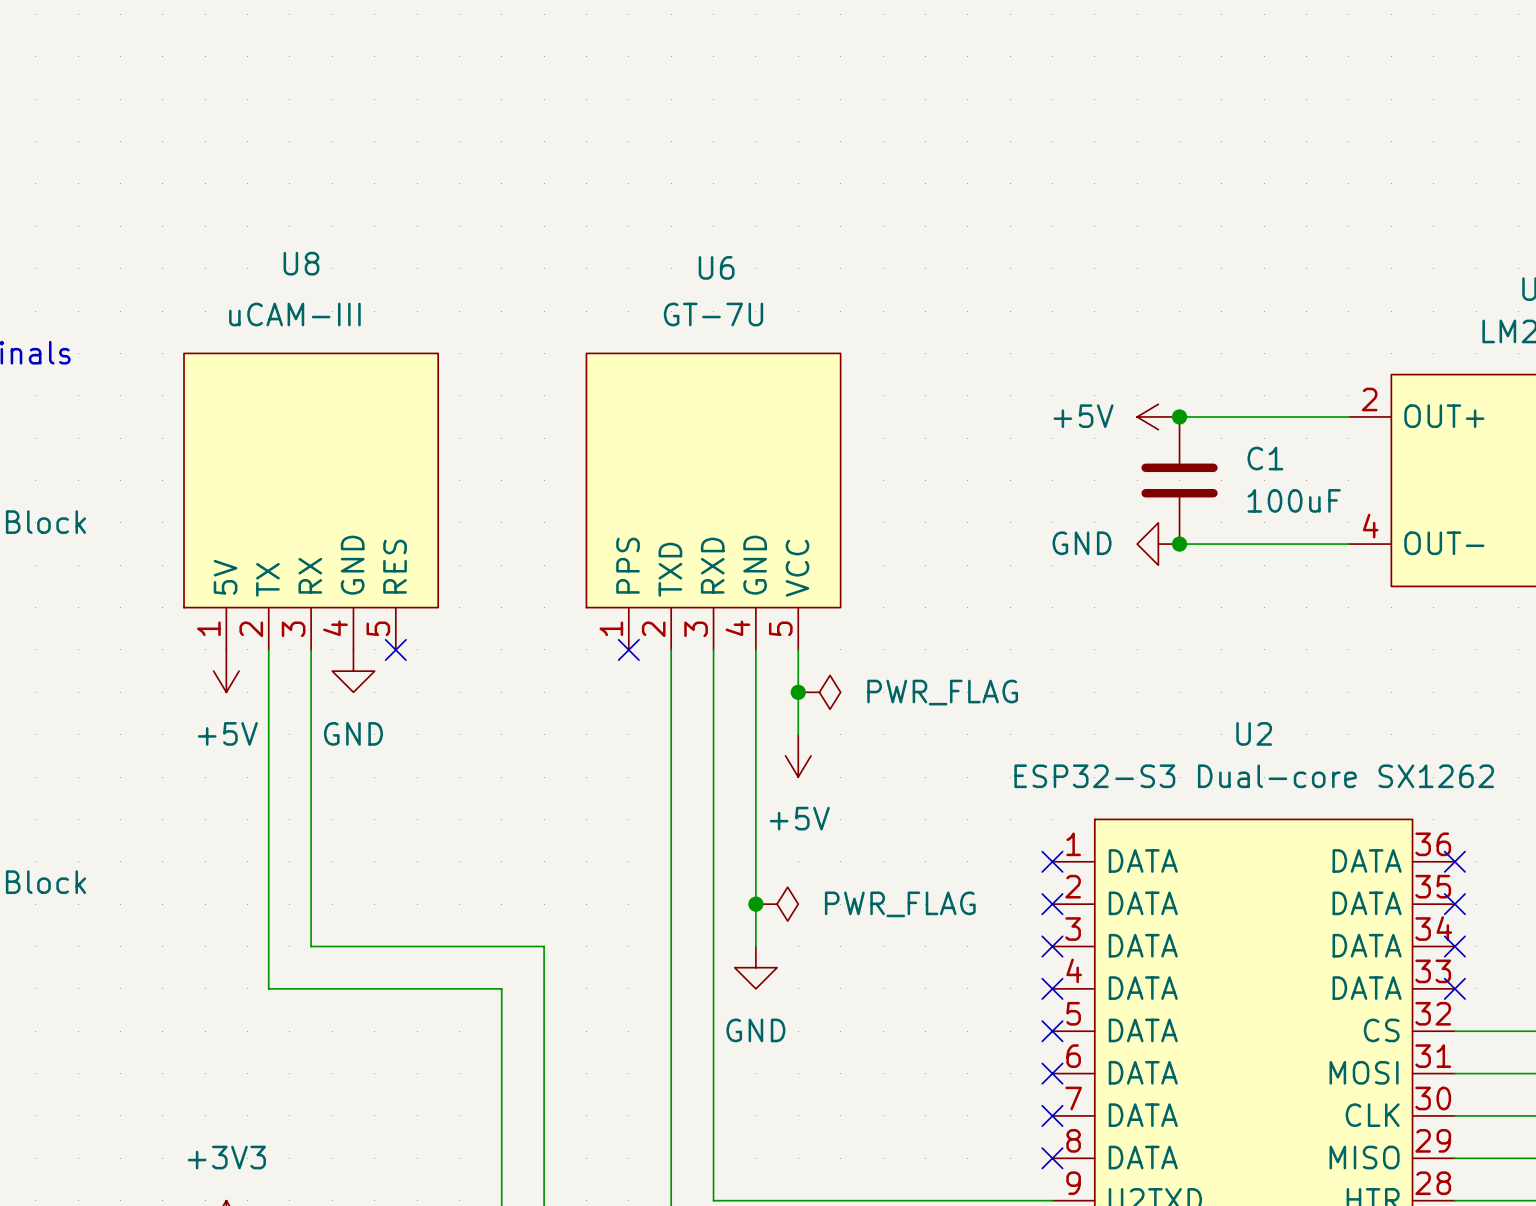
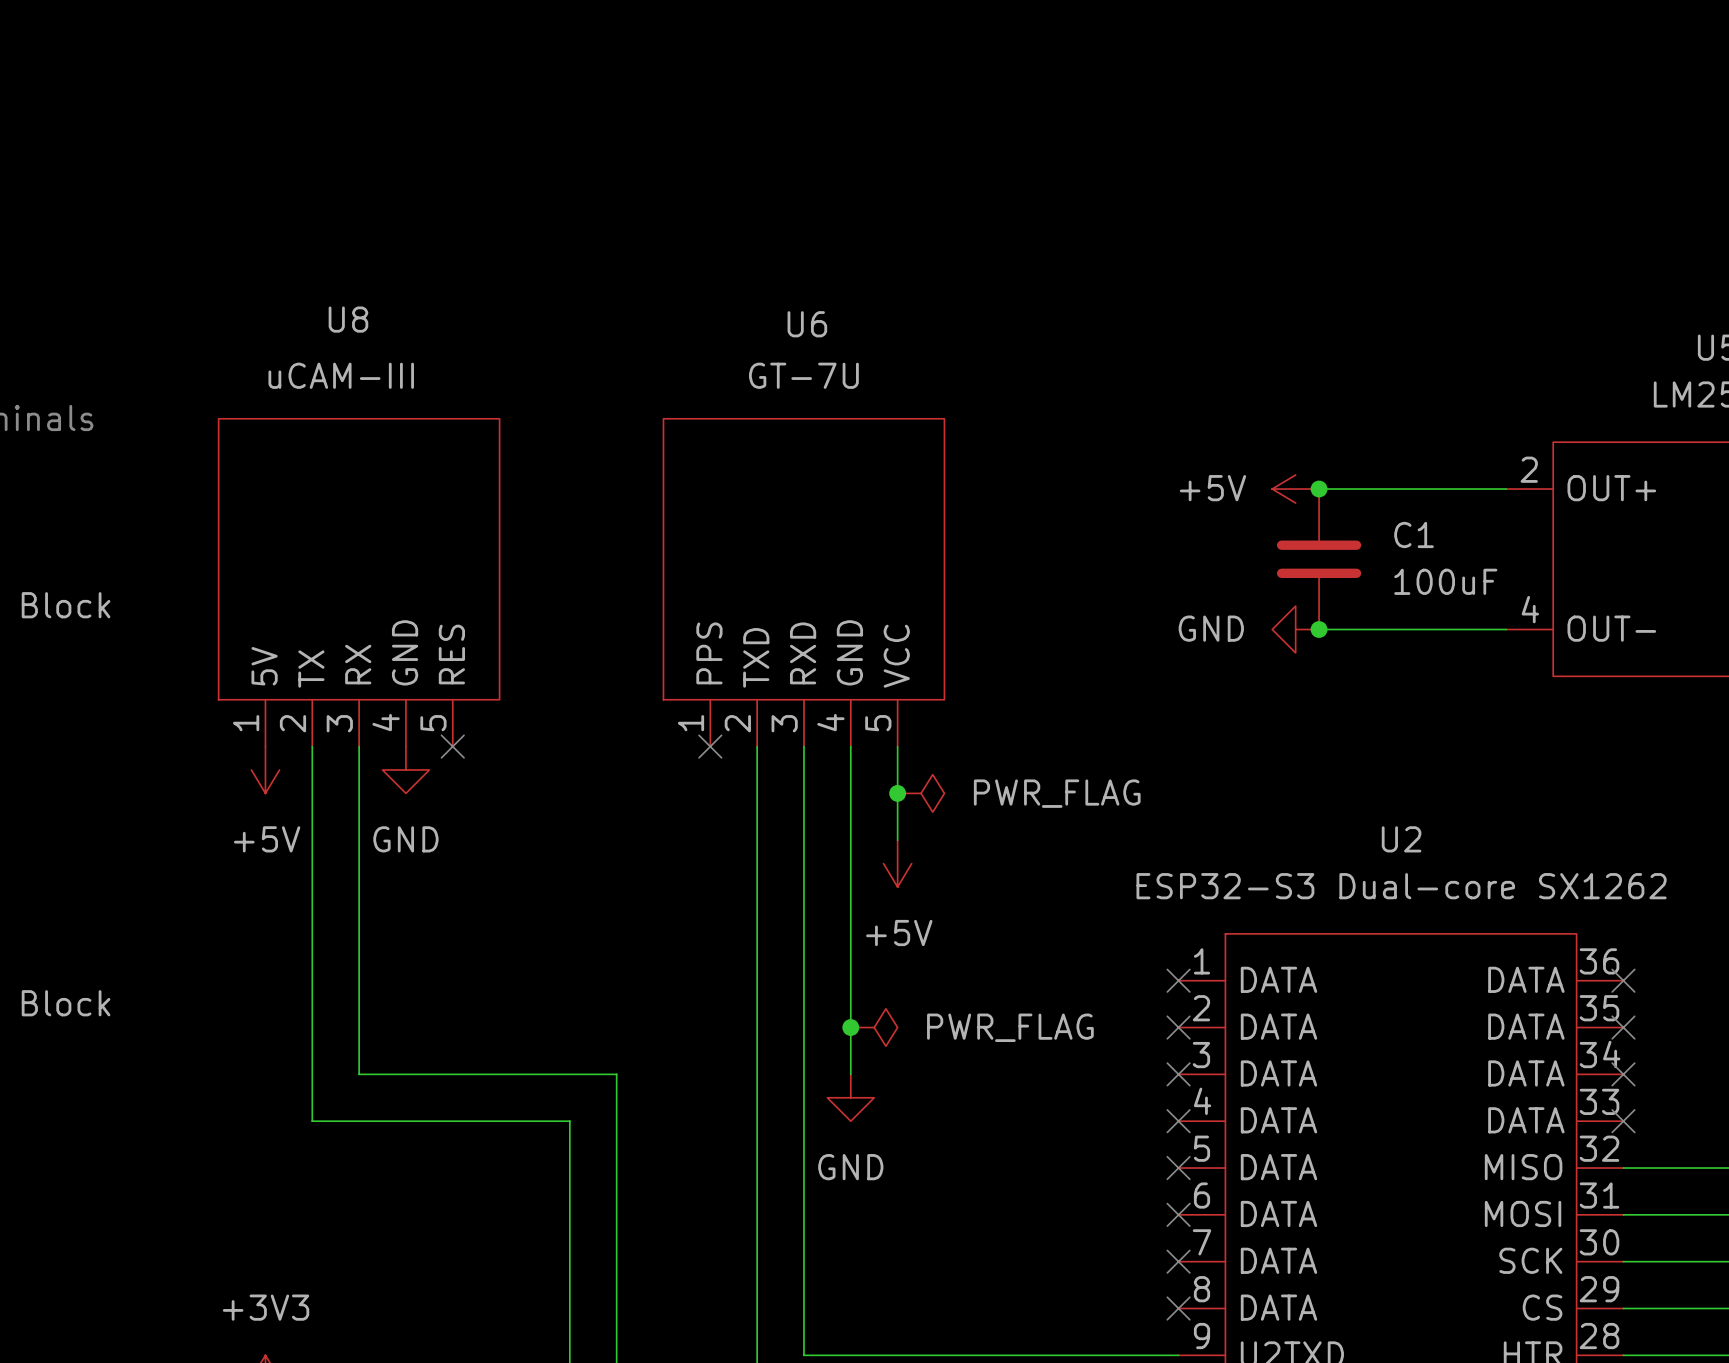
U2 pin name: CS (1381, 1030) -> MISO (1523, 1167)
U2 pin name: CLK (1372, 1115) -> SCK (1530, 1260)
U2 pin name: MISO (1364, 1157) -> CS (1542, 1307)

